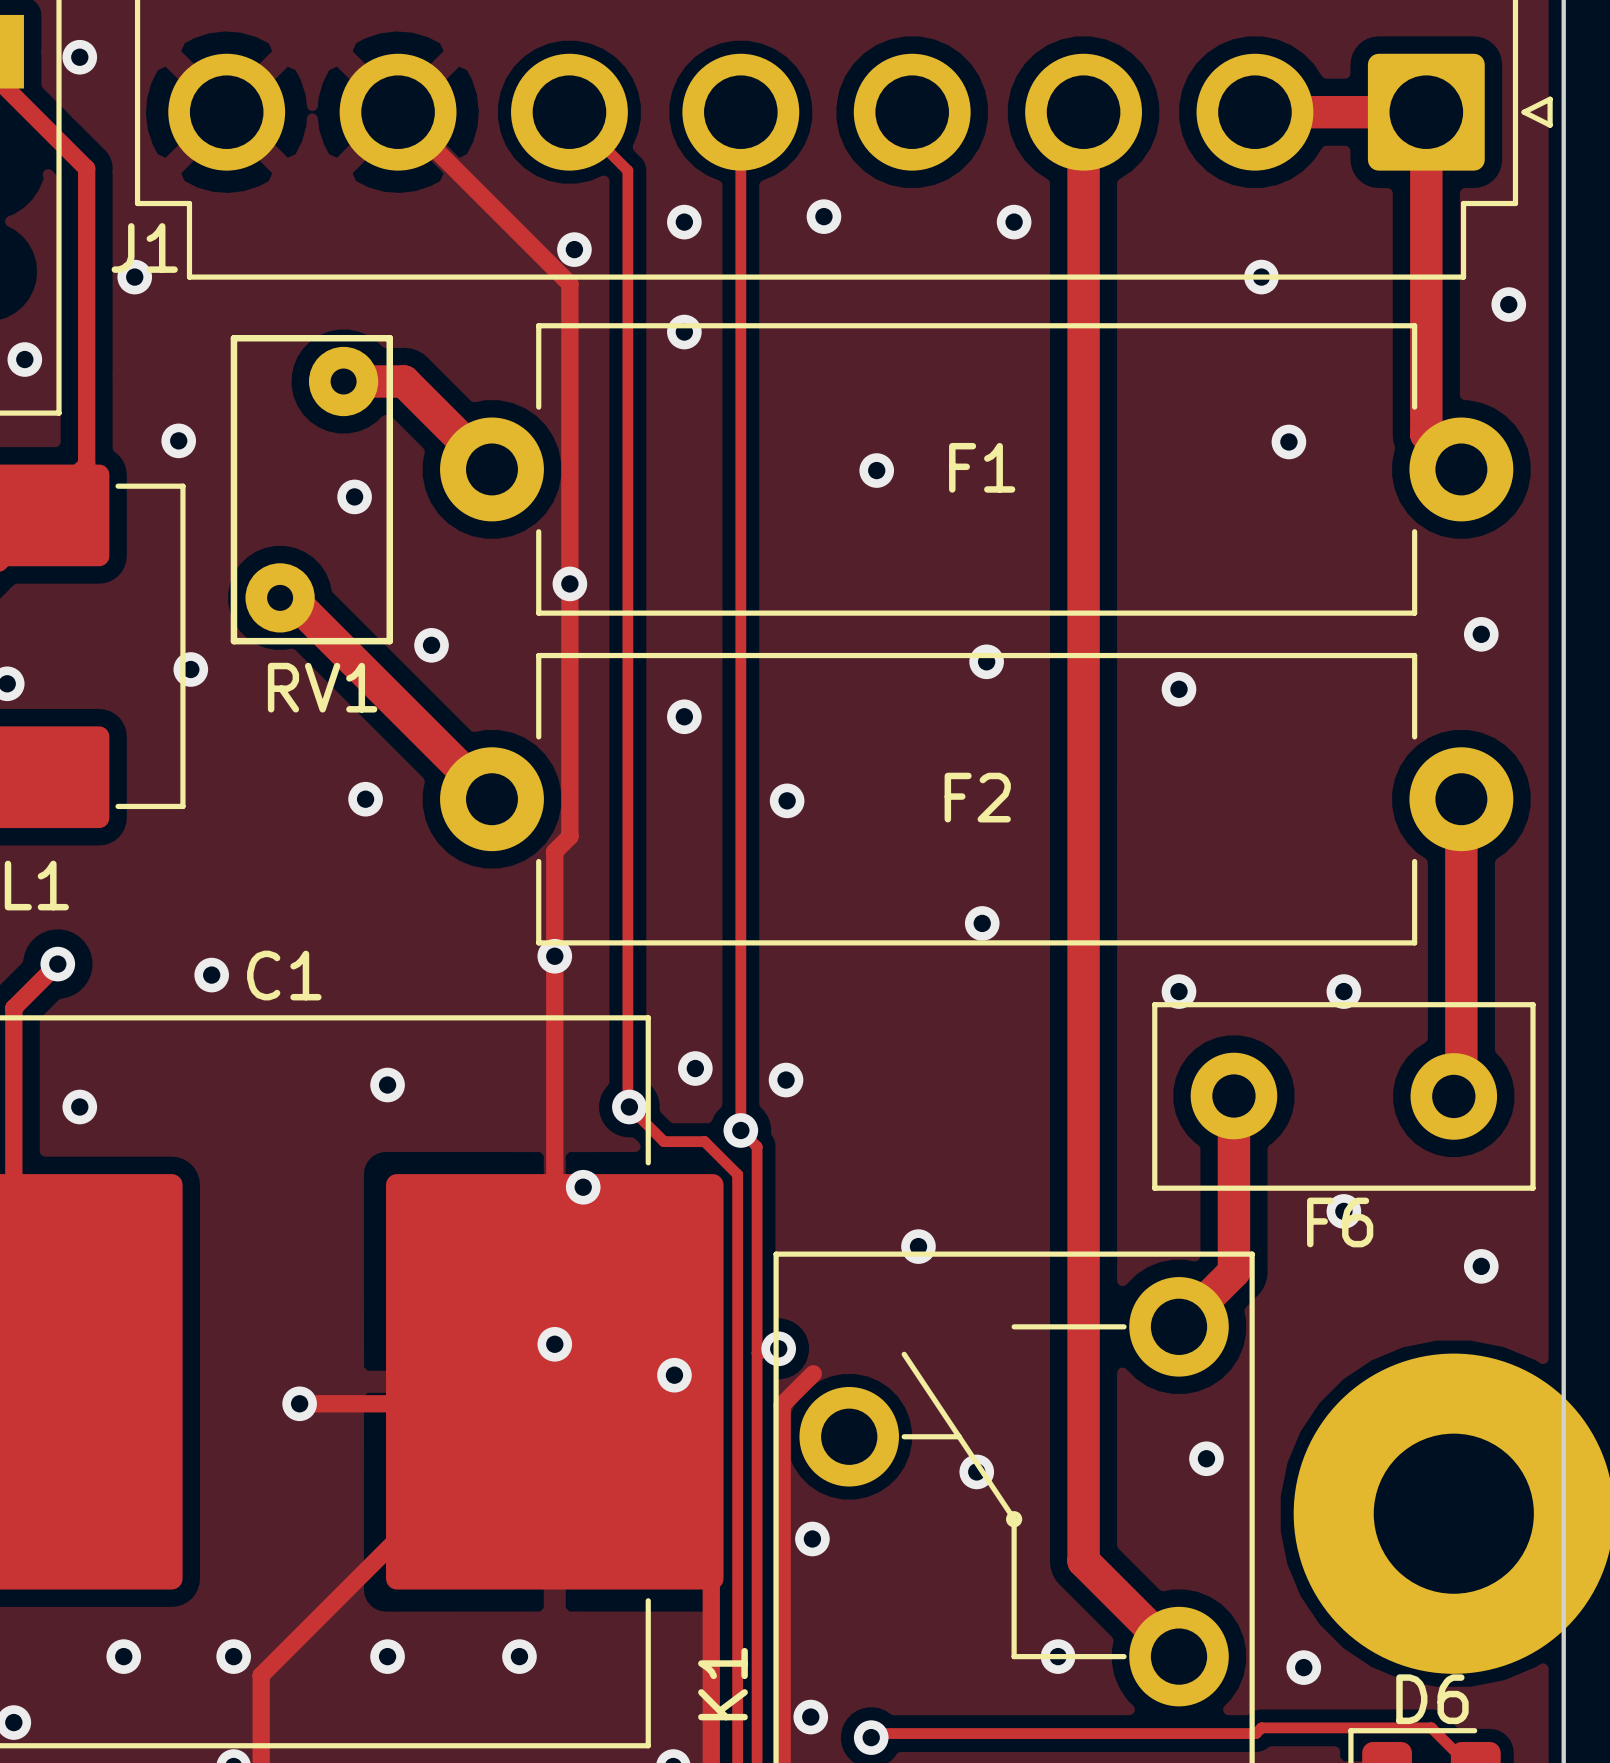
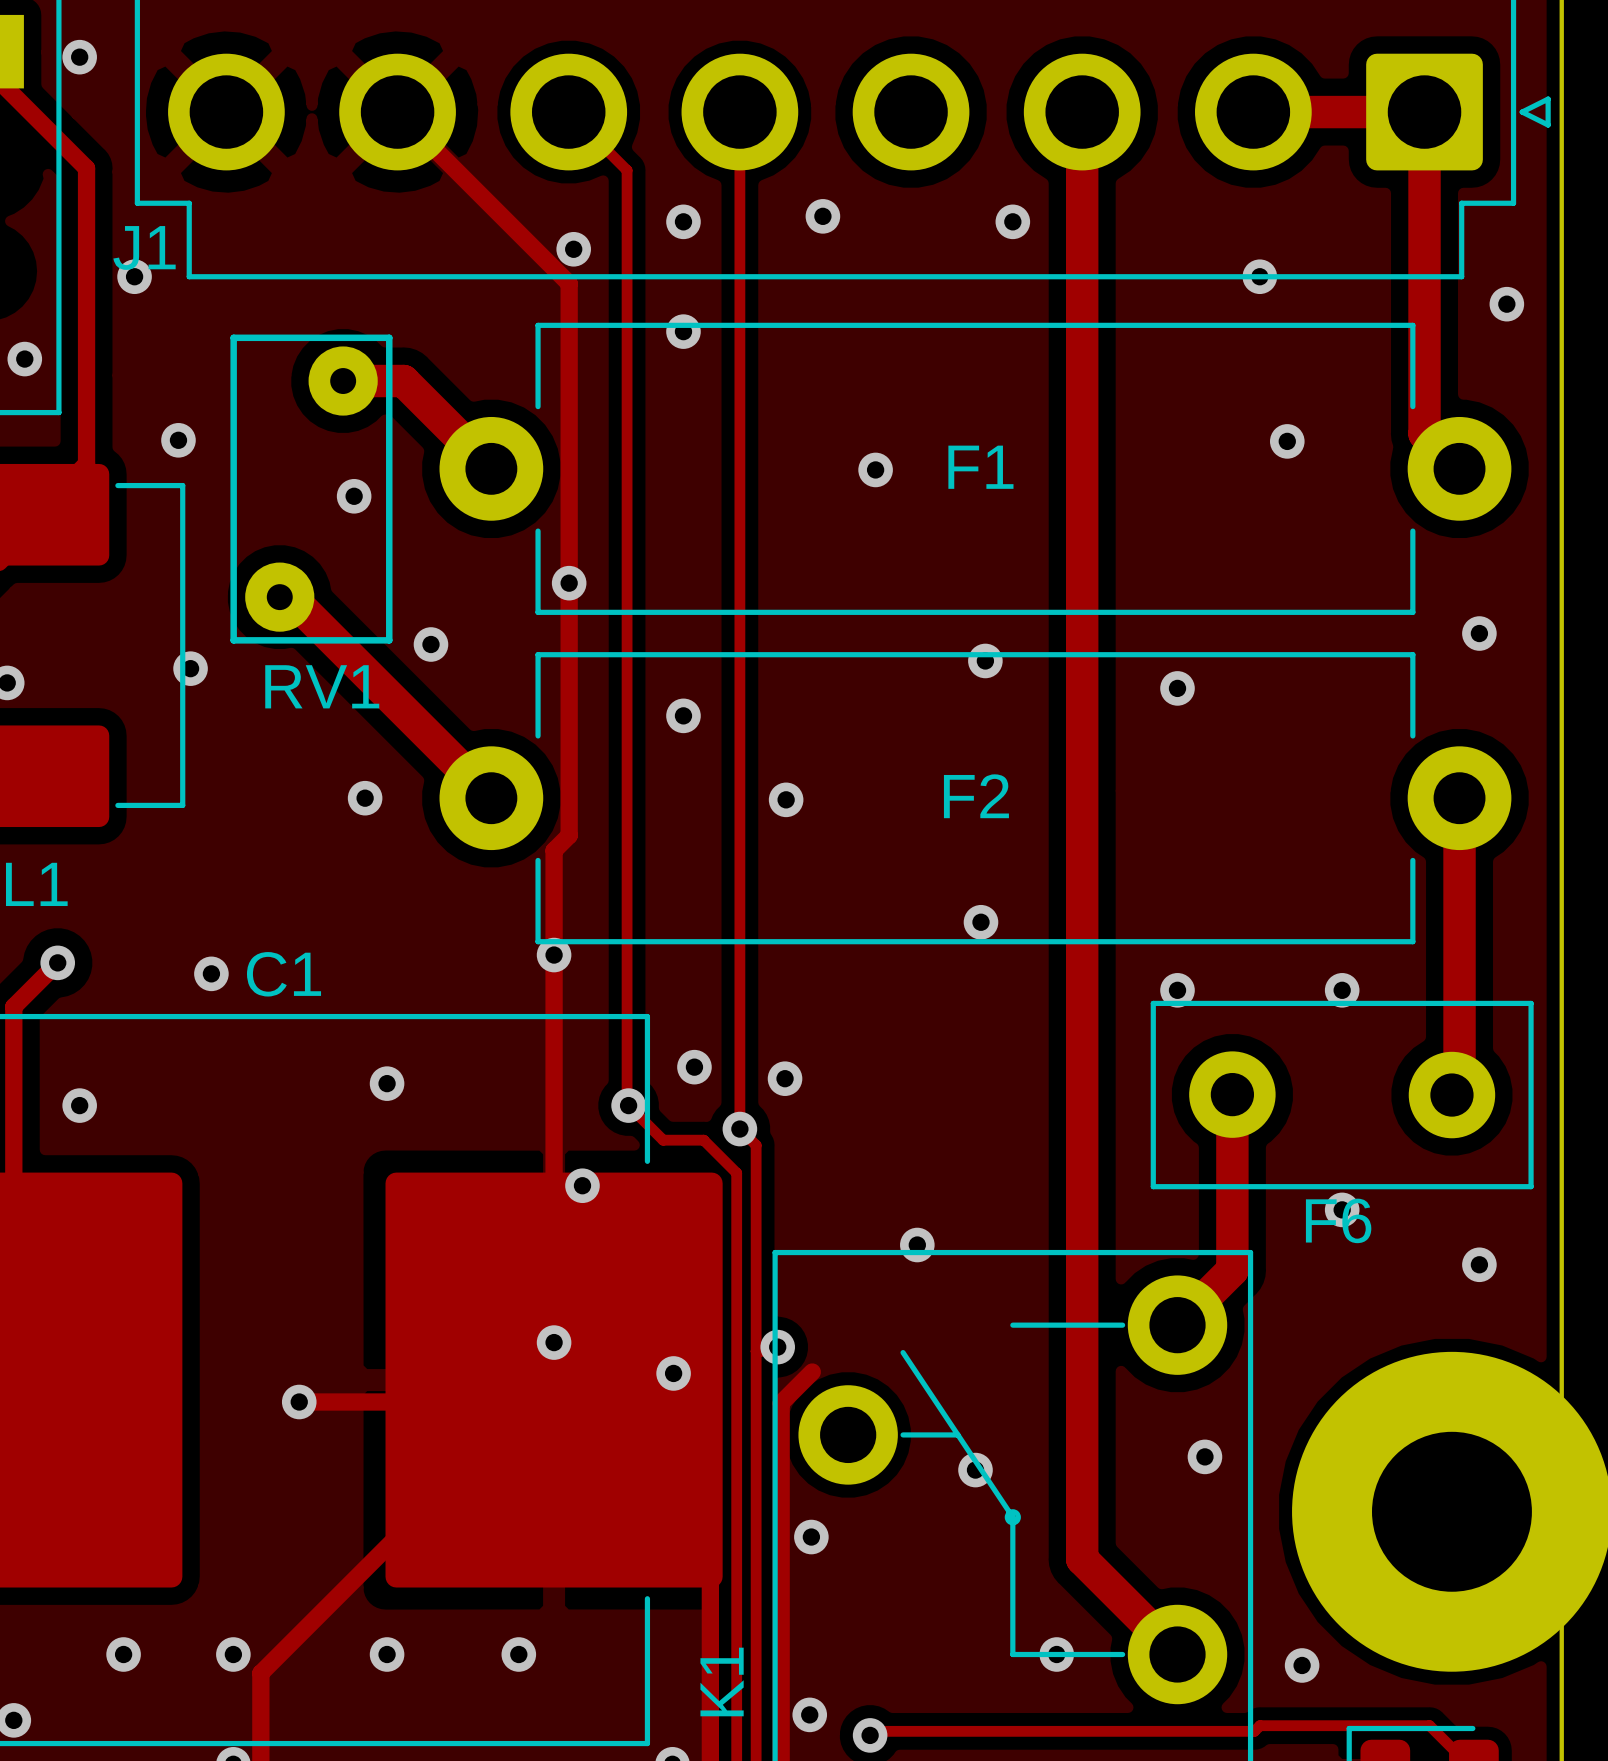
D6 name: D6 (1432, 1699) -> none

